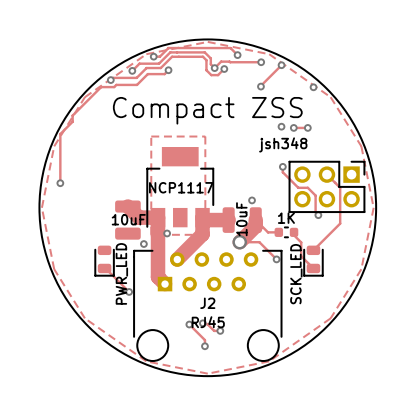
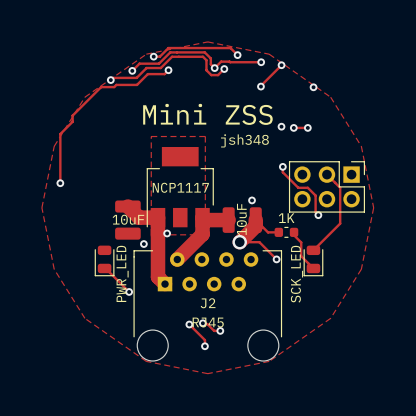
round board edge: [38, 38, 377, 377] -> none
text: Compact ZSS (207, 110) -> Mini ZSS (207, 114)
text position: jsh348 (283, 144) -> jsh348 (244, 140)

